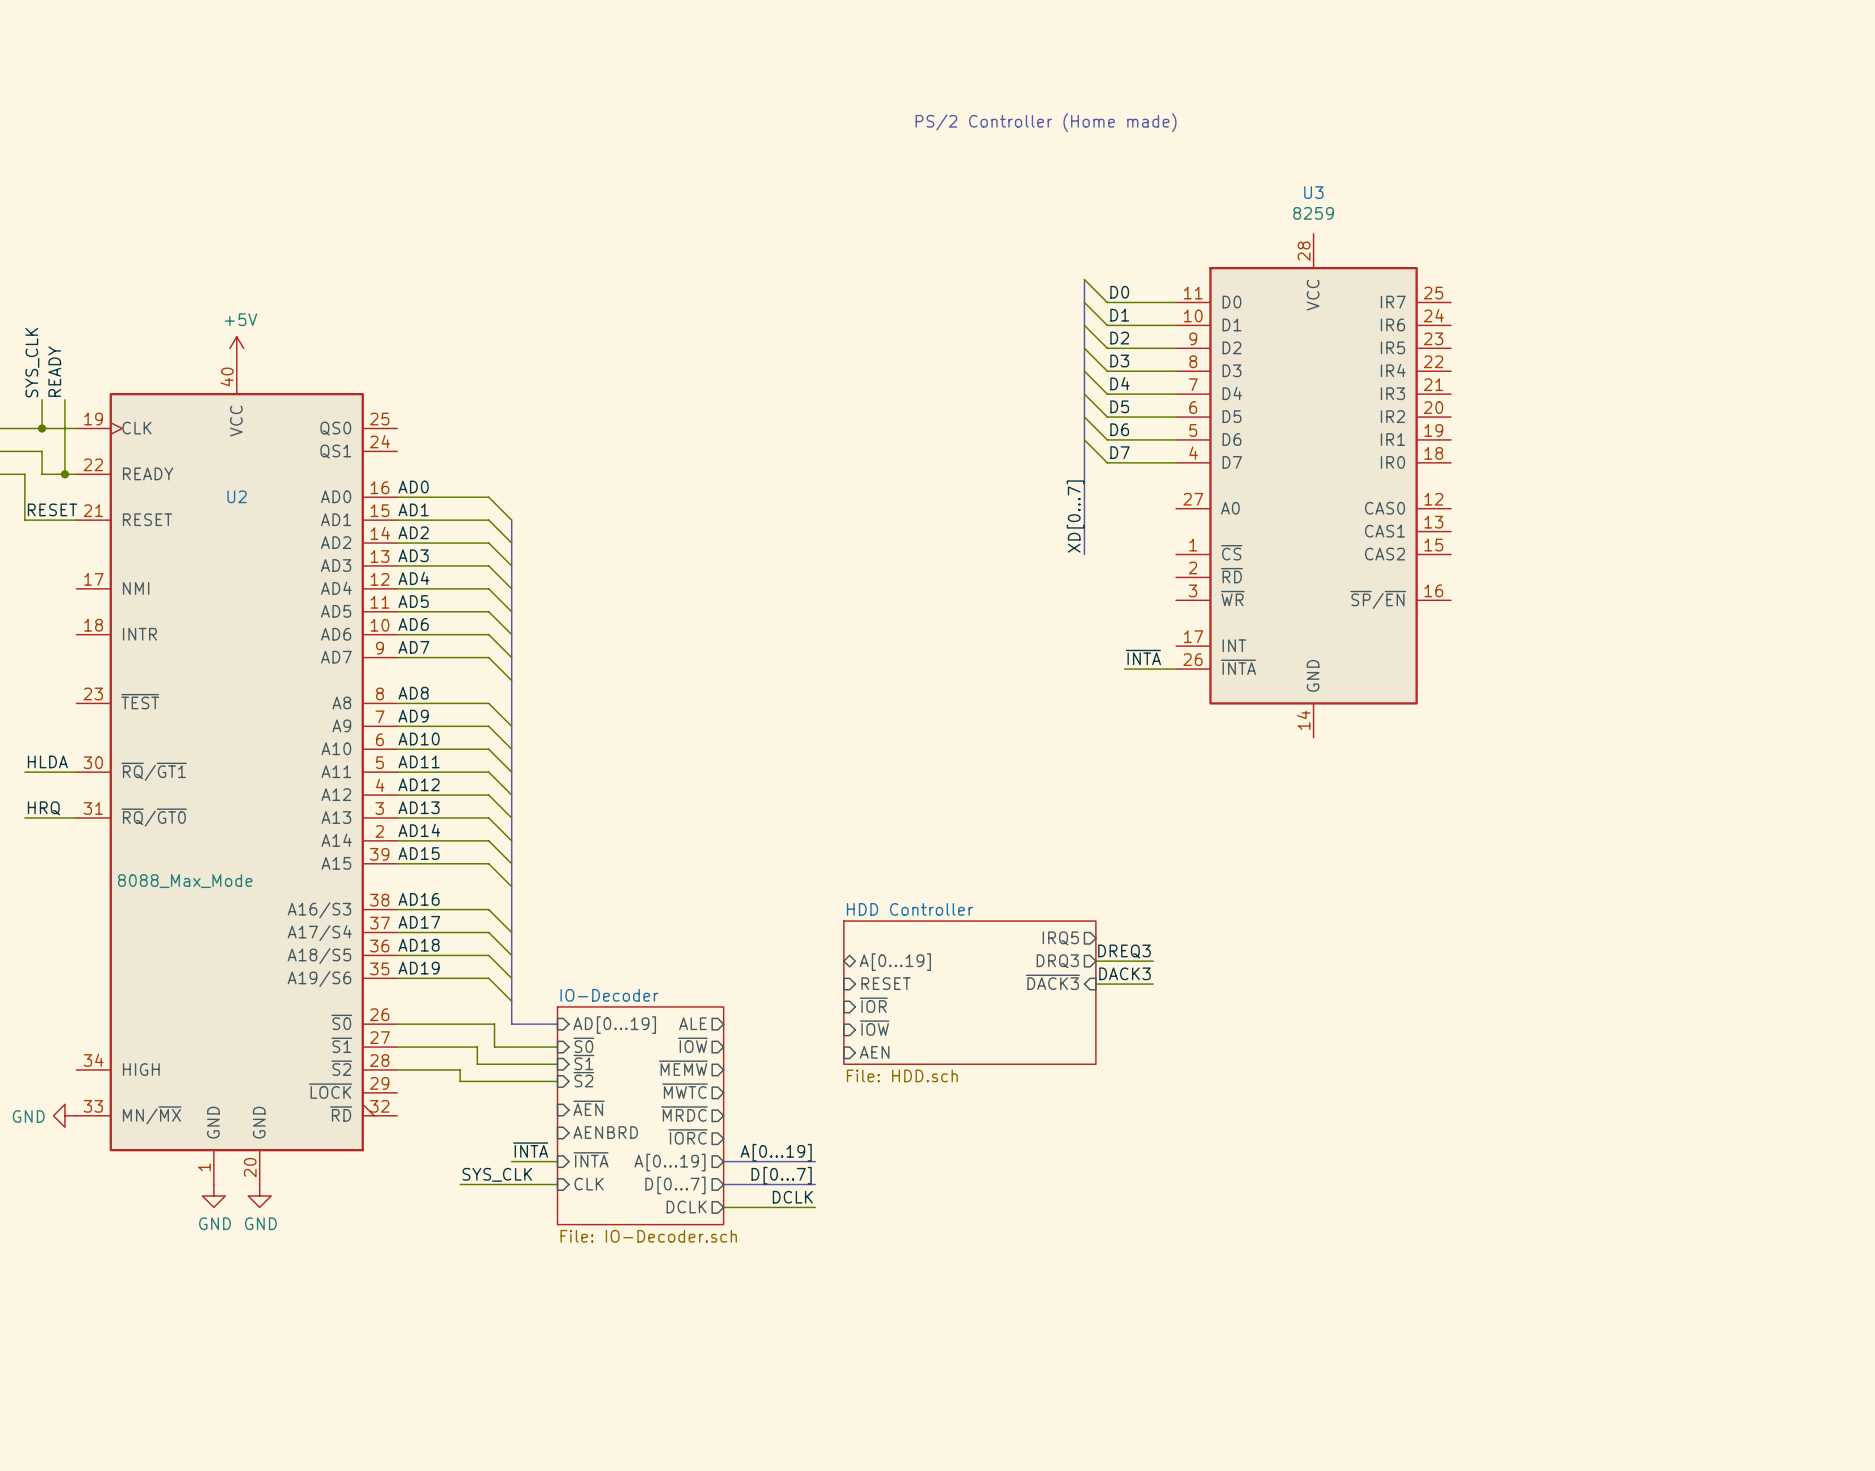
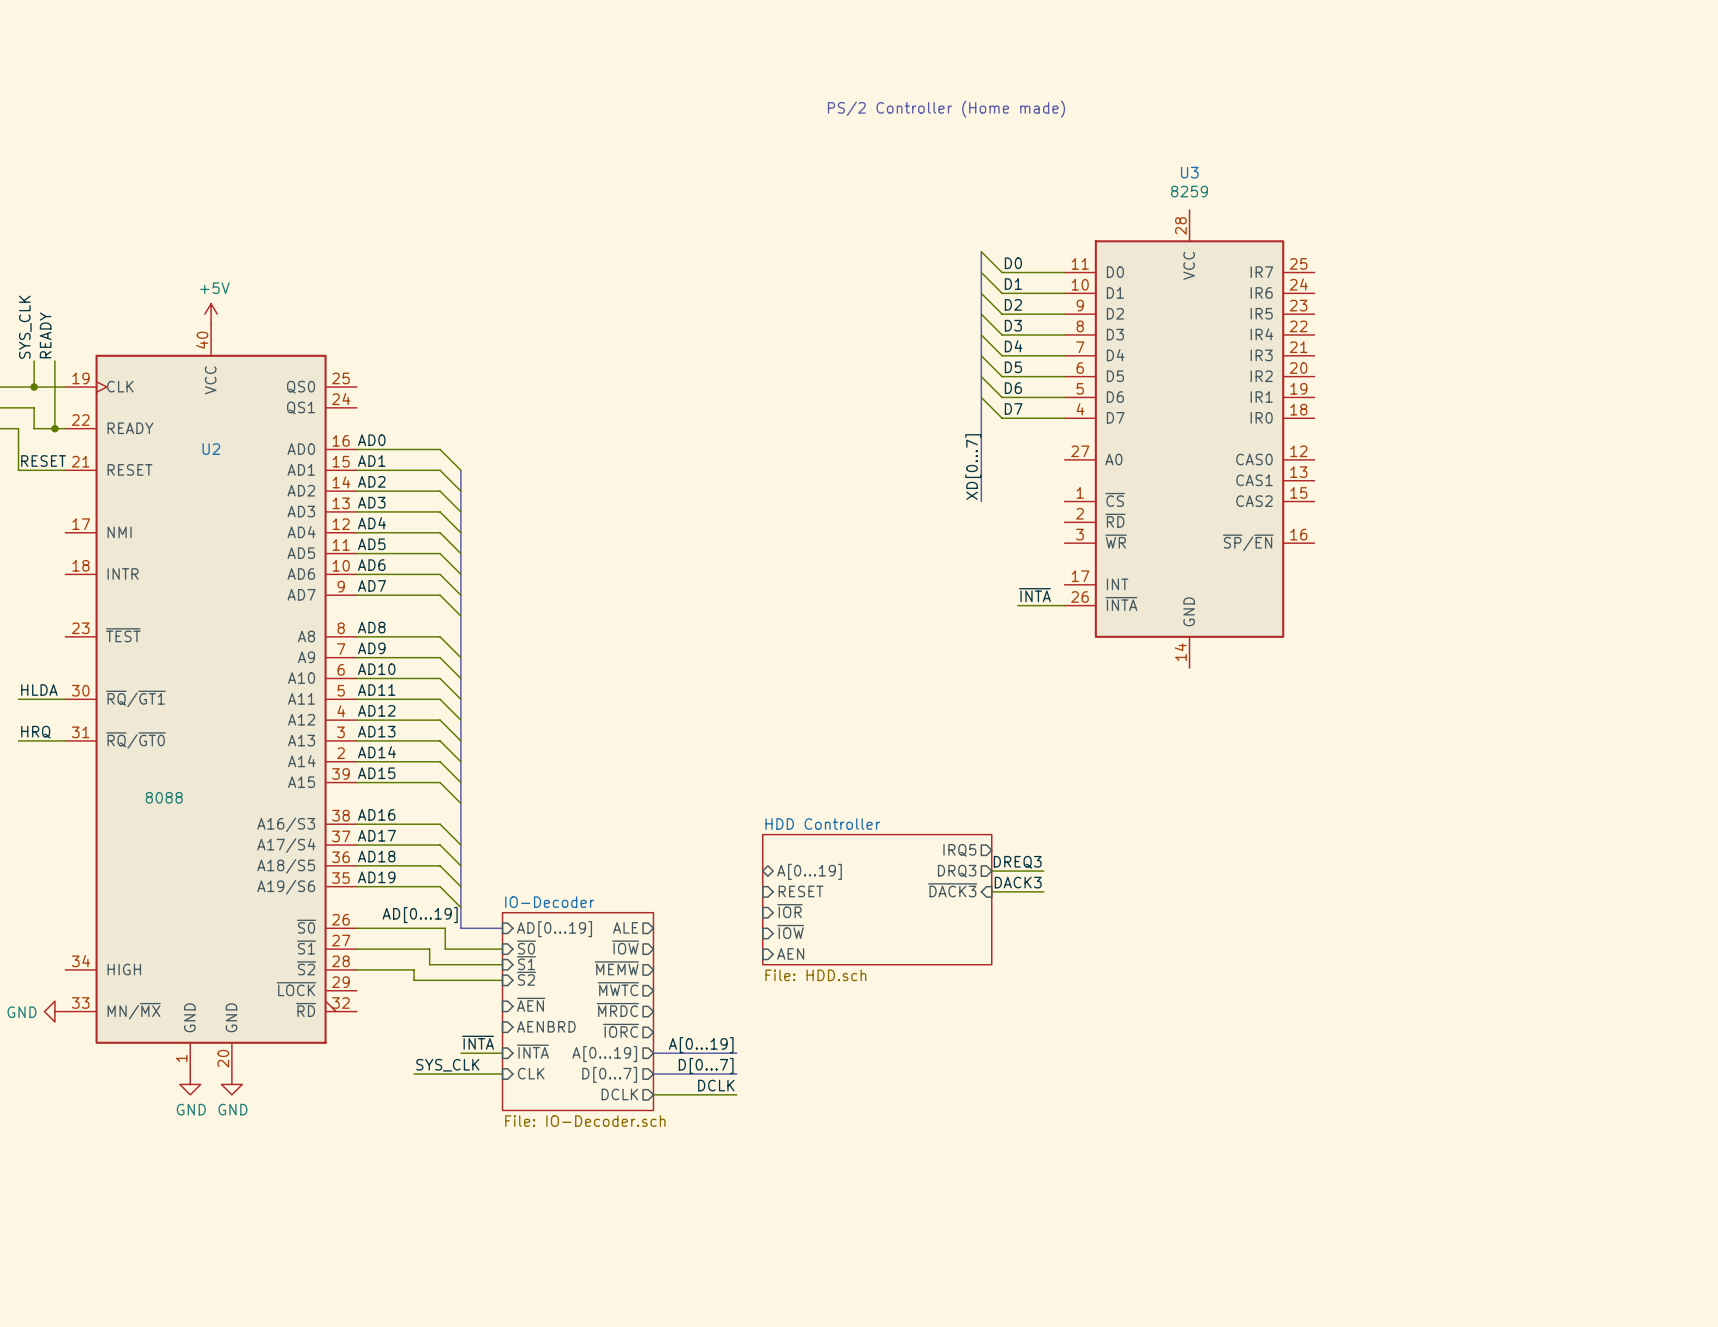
U2 value: 8088_Max_Mode (185, 881) -> 8088 (164, 797)
label: none -> AD[0...19] (420, 915)

